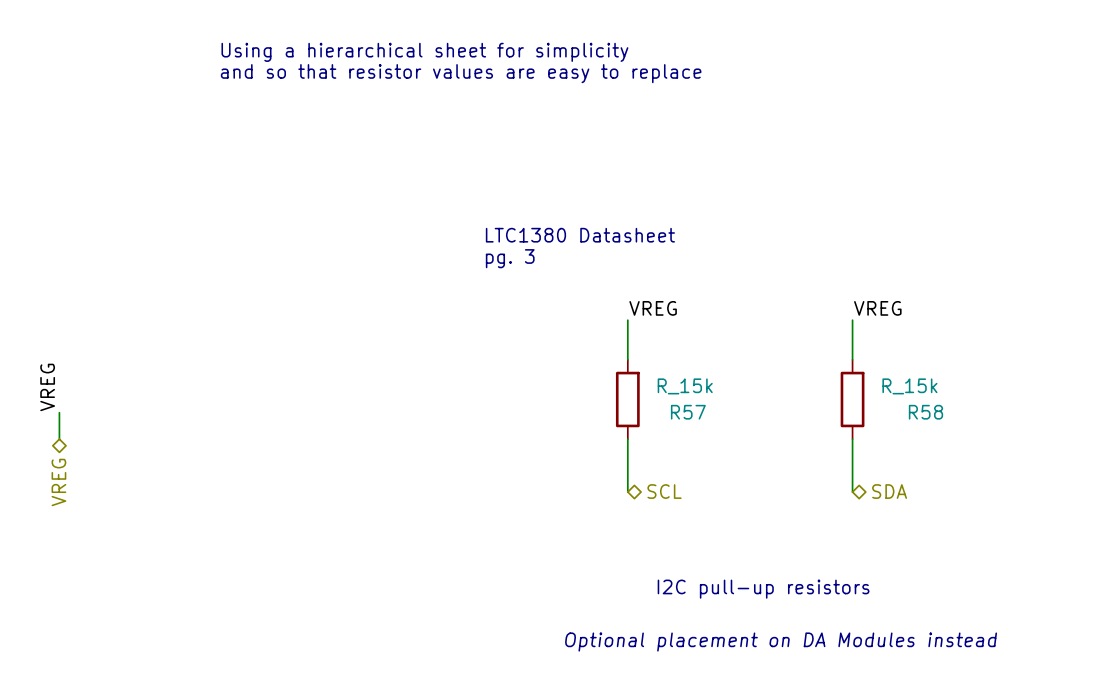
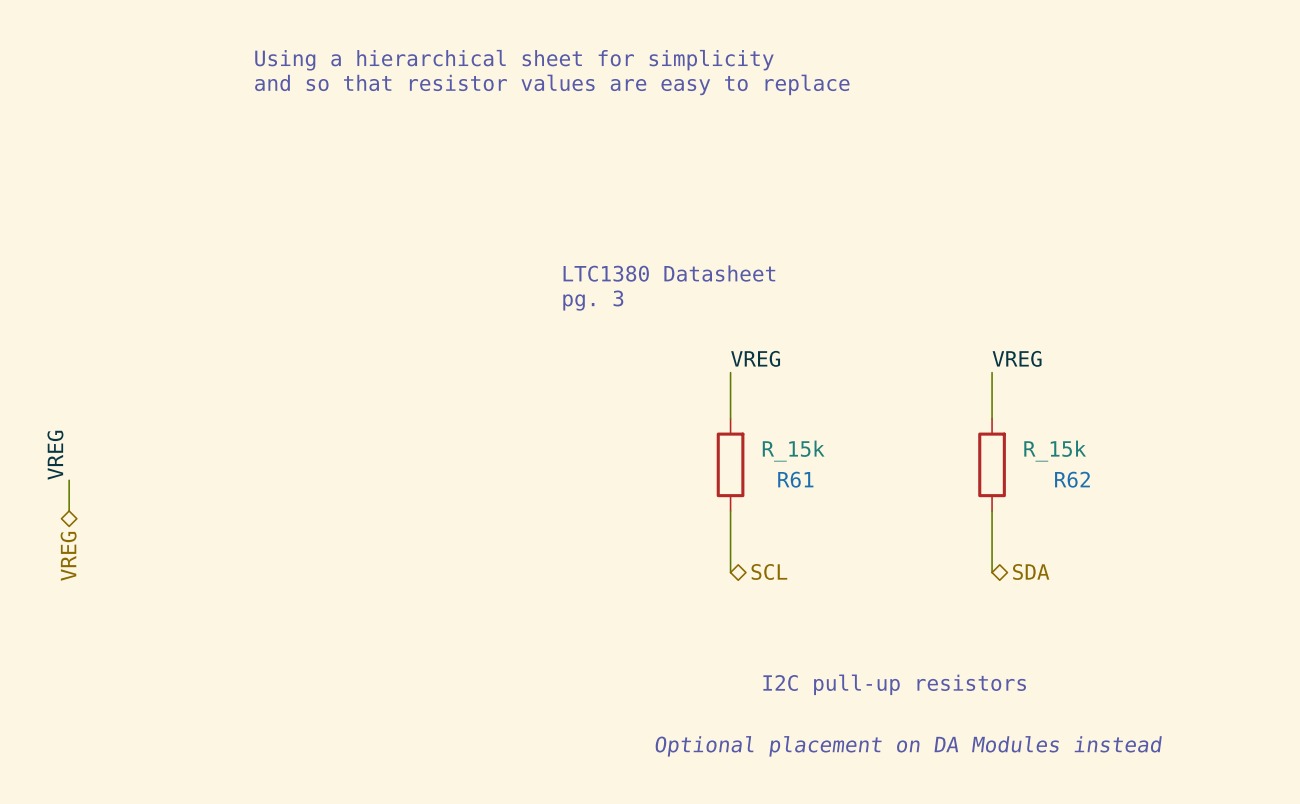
R57 name: R57 (688, 412) -> R61 (795, 479)
R58 name: R58 (925, 412) -> R62 (1072, 479)

